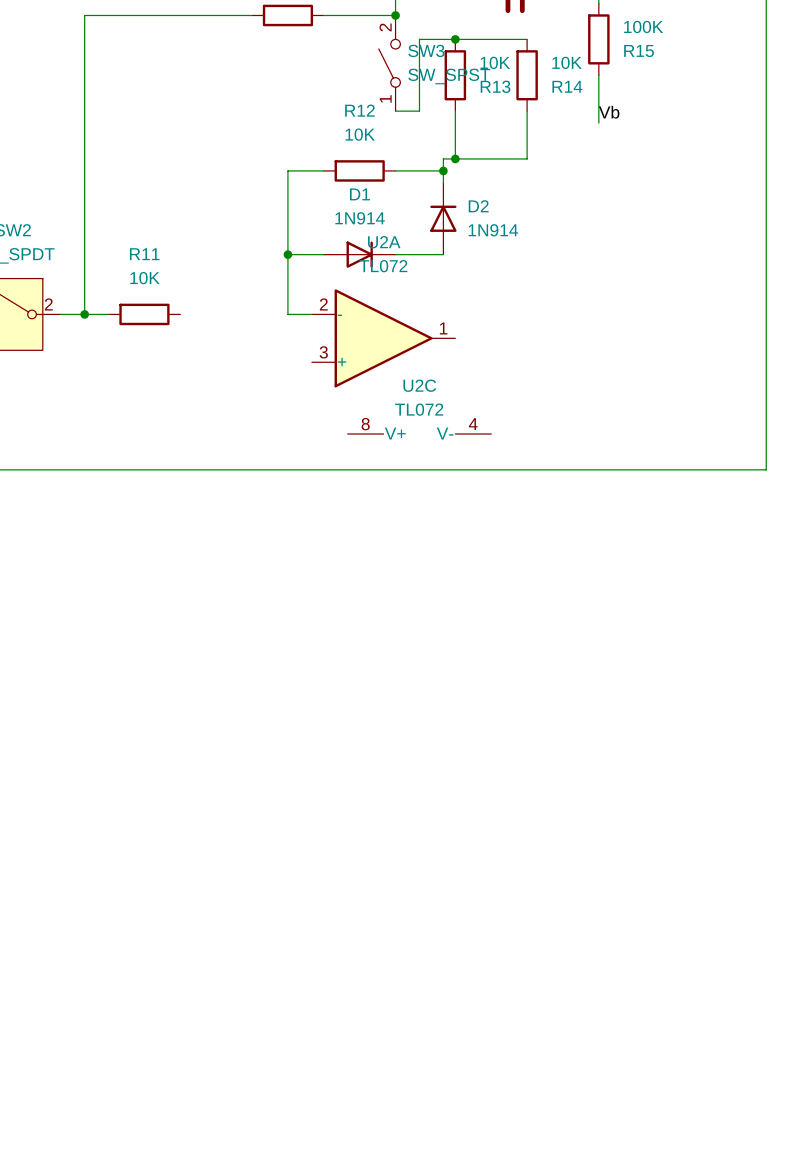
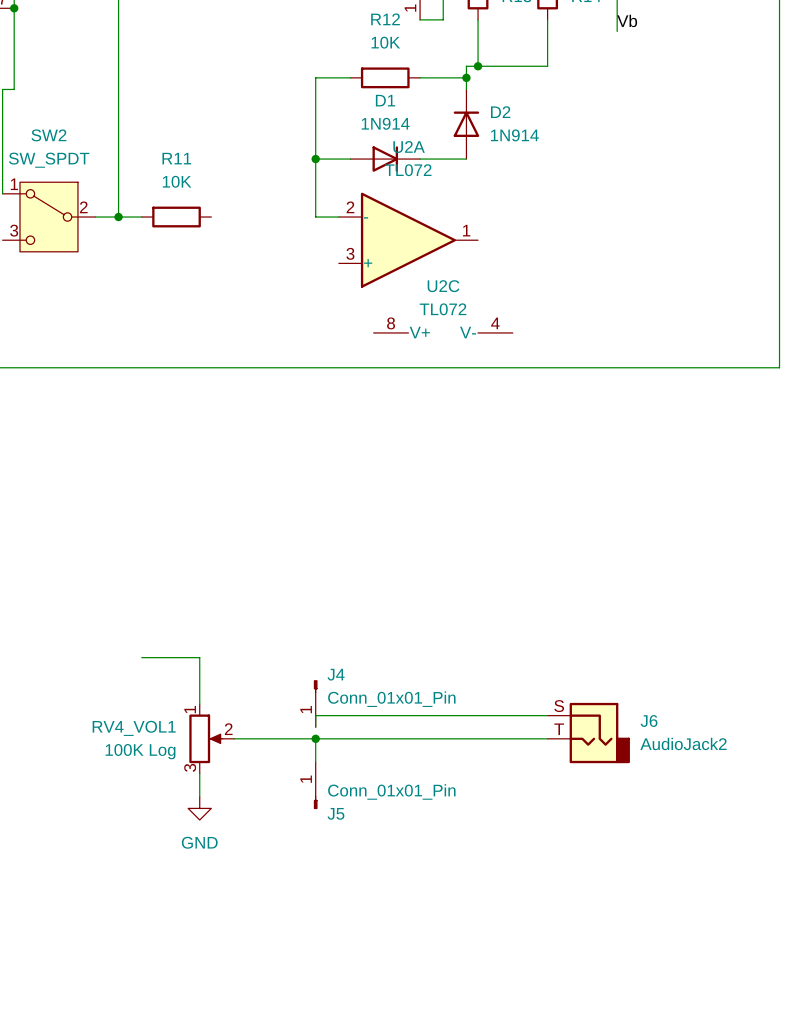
wire: none -> (141, 657) (199, 657) (199, 704)
J4: none -> Conn_01x01_Pin (315, 703)
wire: none -> (547, 715) (315, 715) (315, 727)
J6: none -> AudioJack2 (588, 733)
RV4_VOL1: none -> 100K Log (211, 738)
wire: none -> (234, 738) (547, 738)
wire: none -> (315, 738) (315, 762)
junction: none -> (315, 738)
wire: none -> (199, 773) (199, 796)
J5: none -> Conn_01x01_Pin (315, 785)
power symbol: none -> GND (199, 808)

